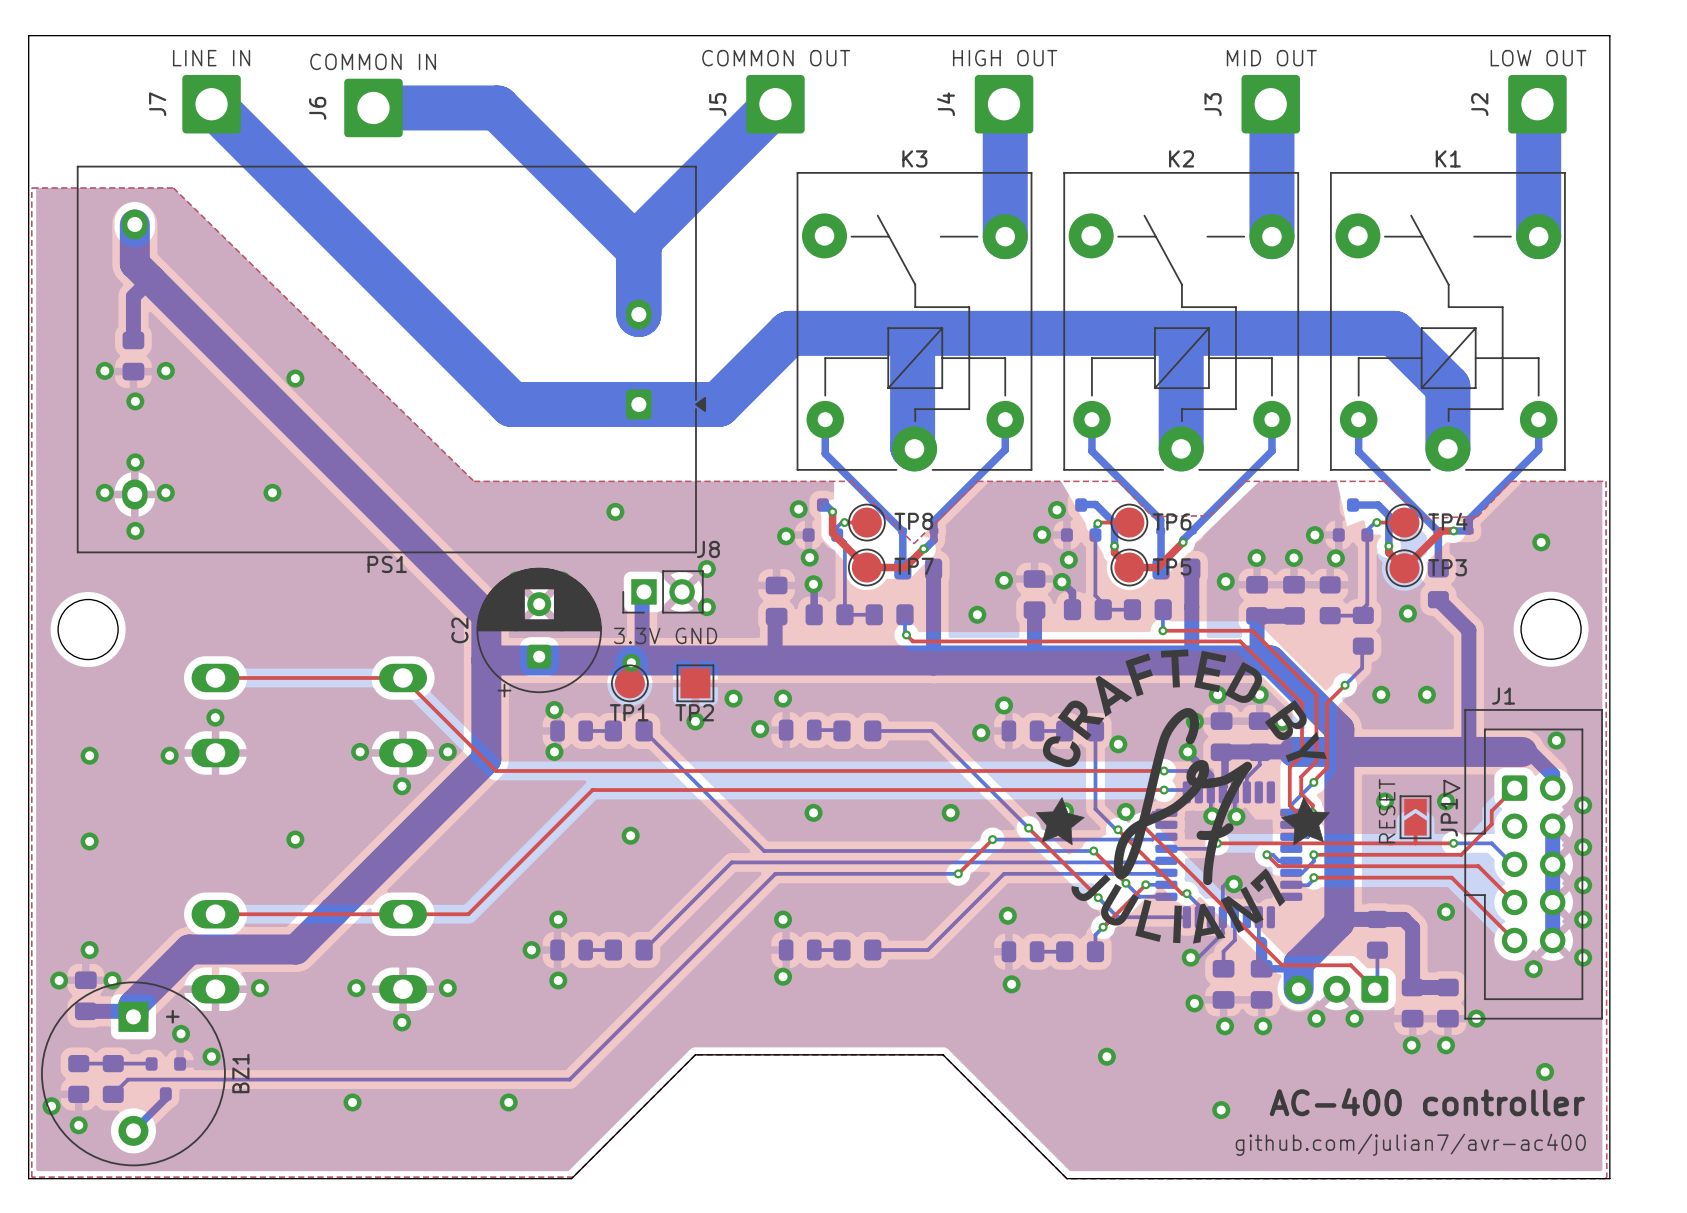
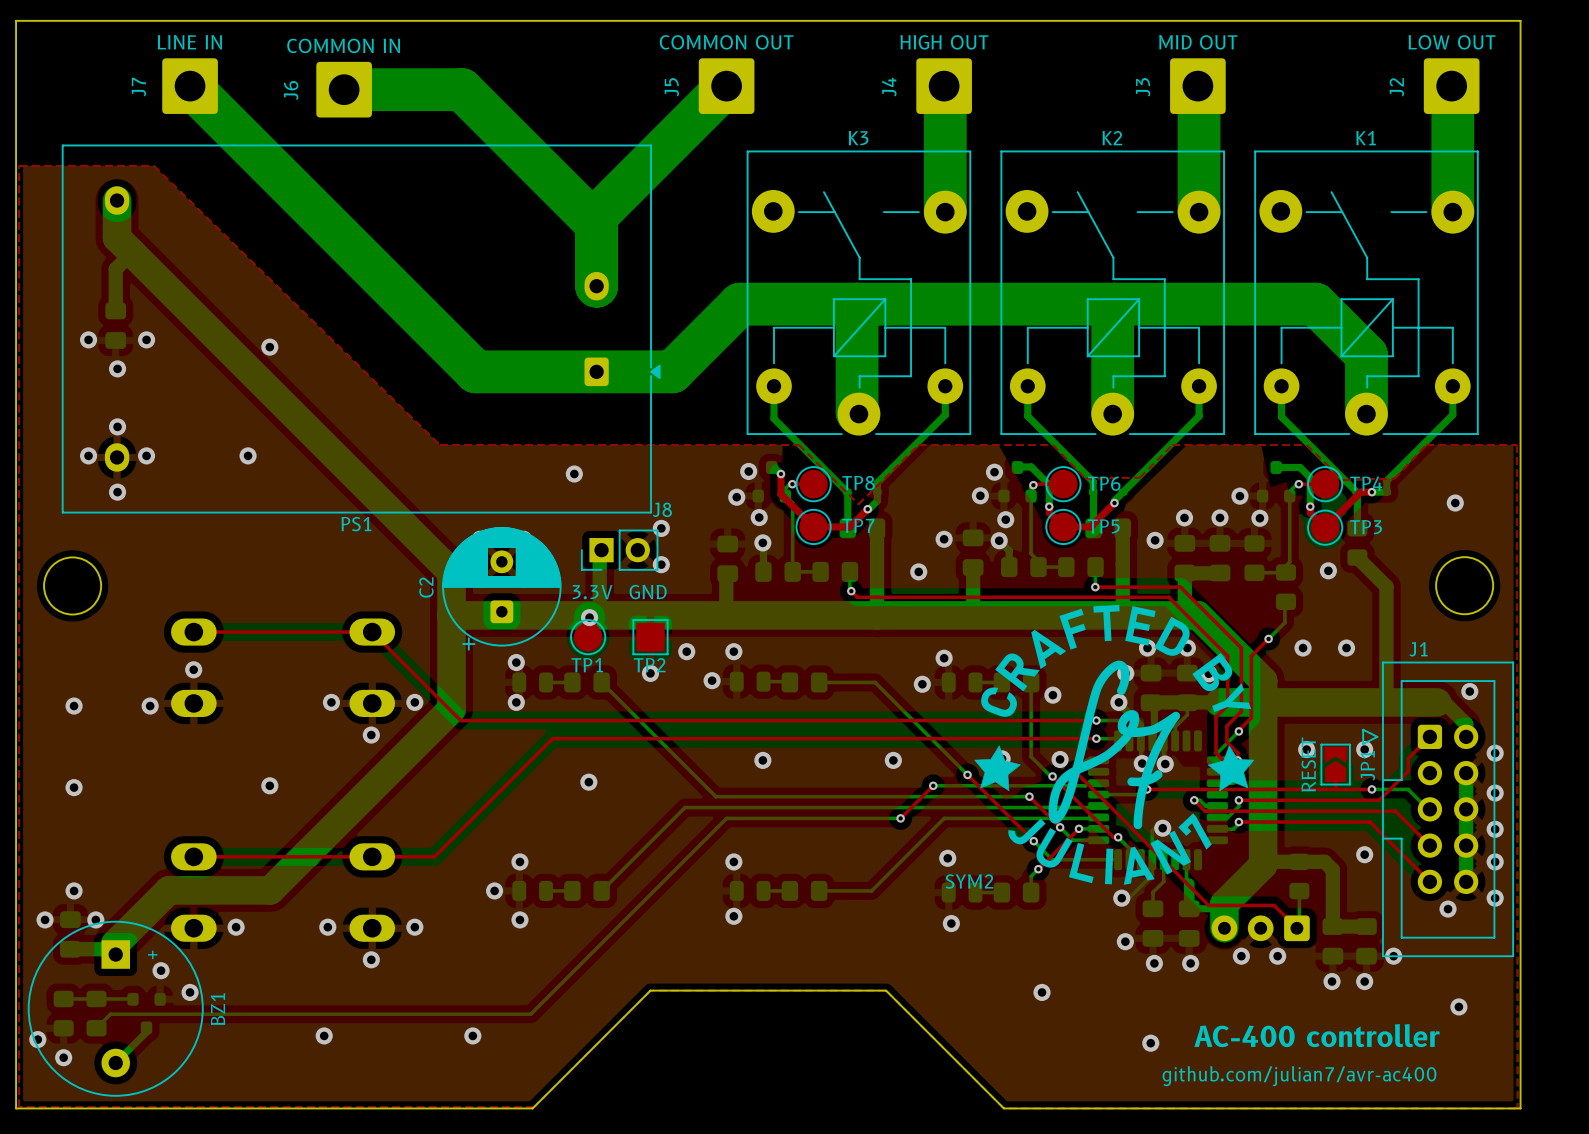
SYM2: none -> (1114, 744)

